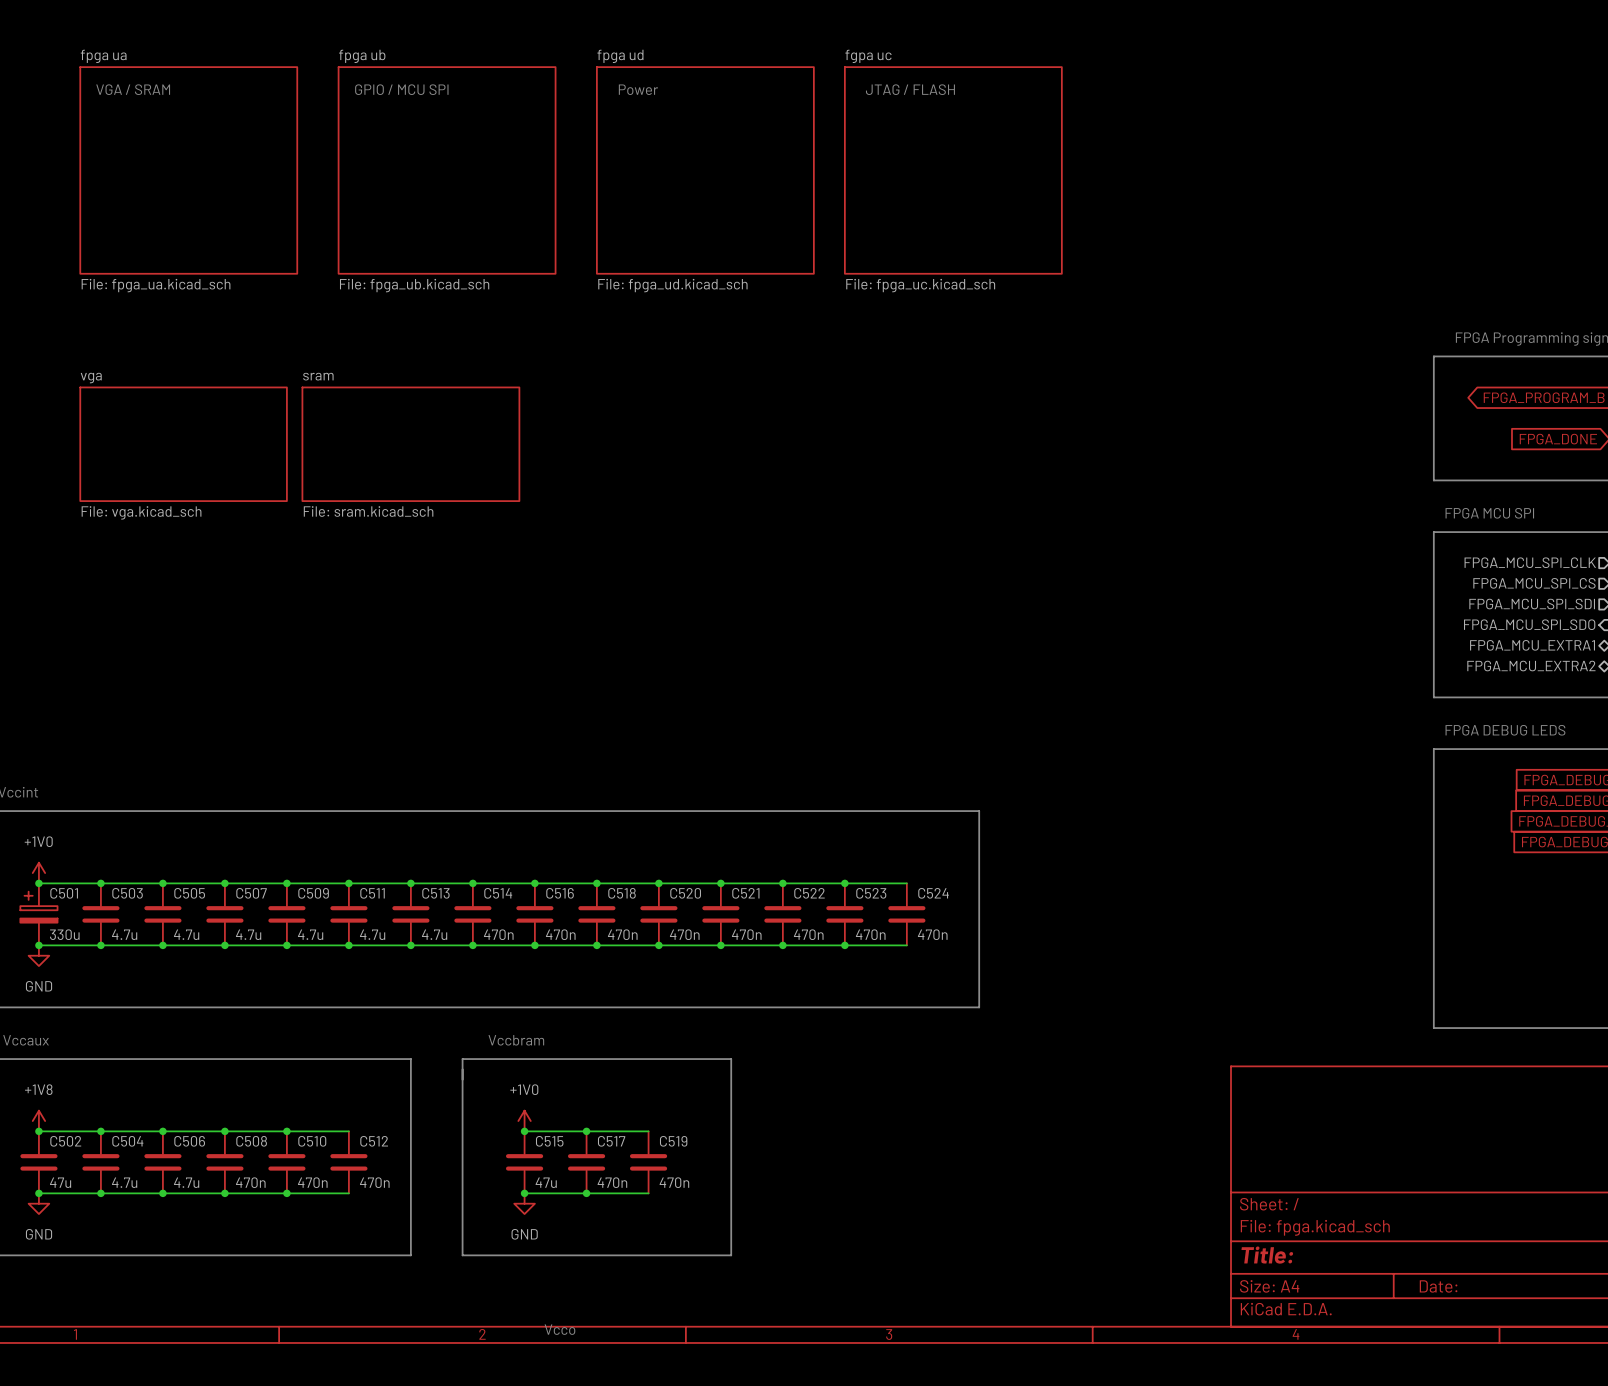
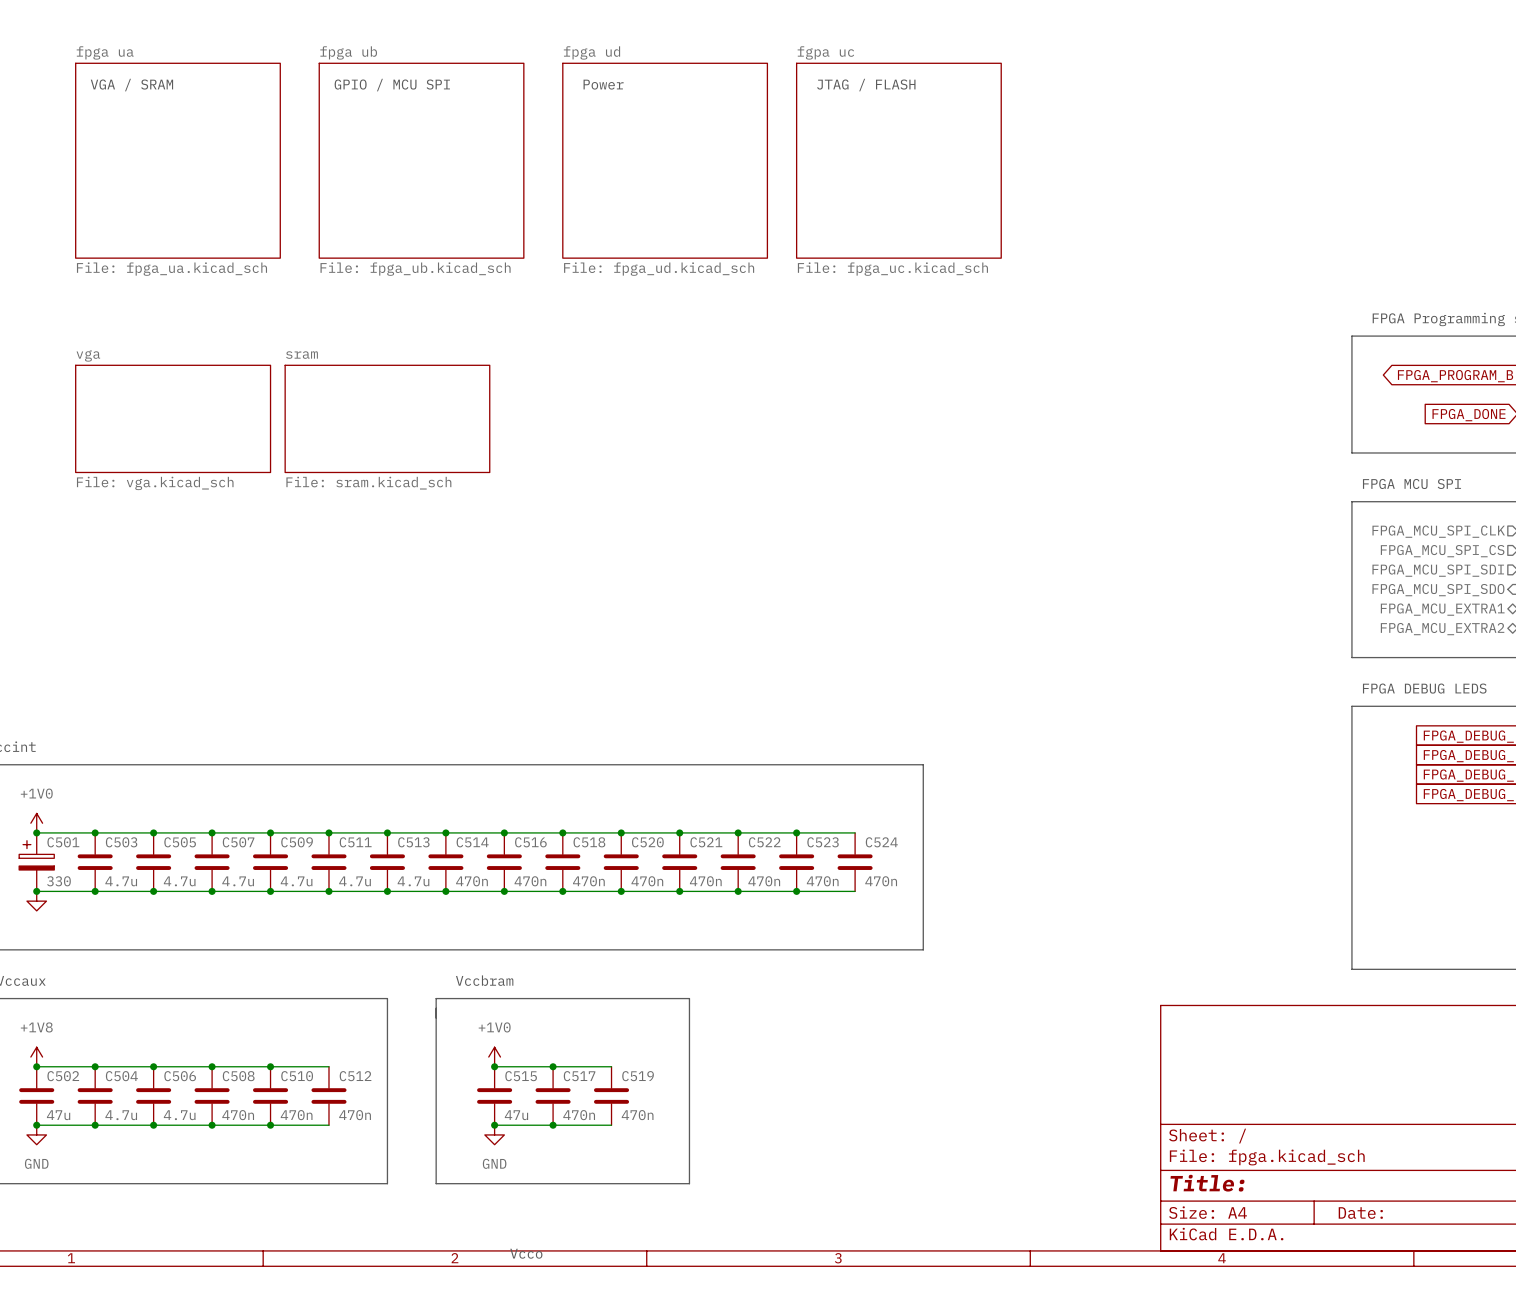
C501 value: 330u (64, 934) -> 330 (58, 881)
power symbol text: GND (39, 986) -> none

